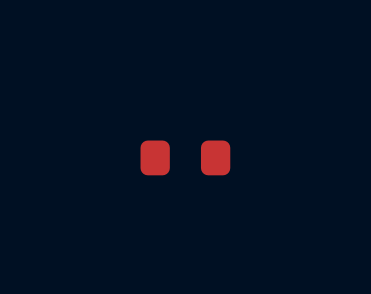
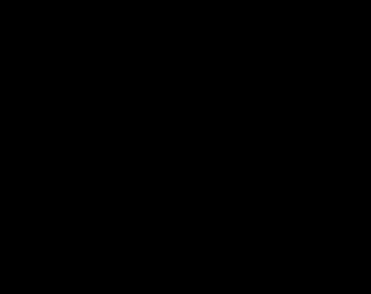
part: (185, 157) -> none

